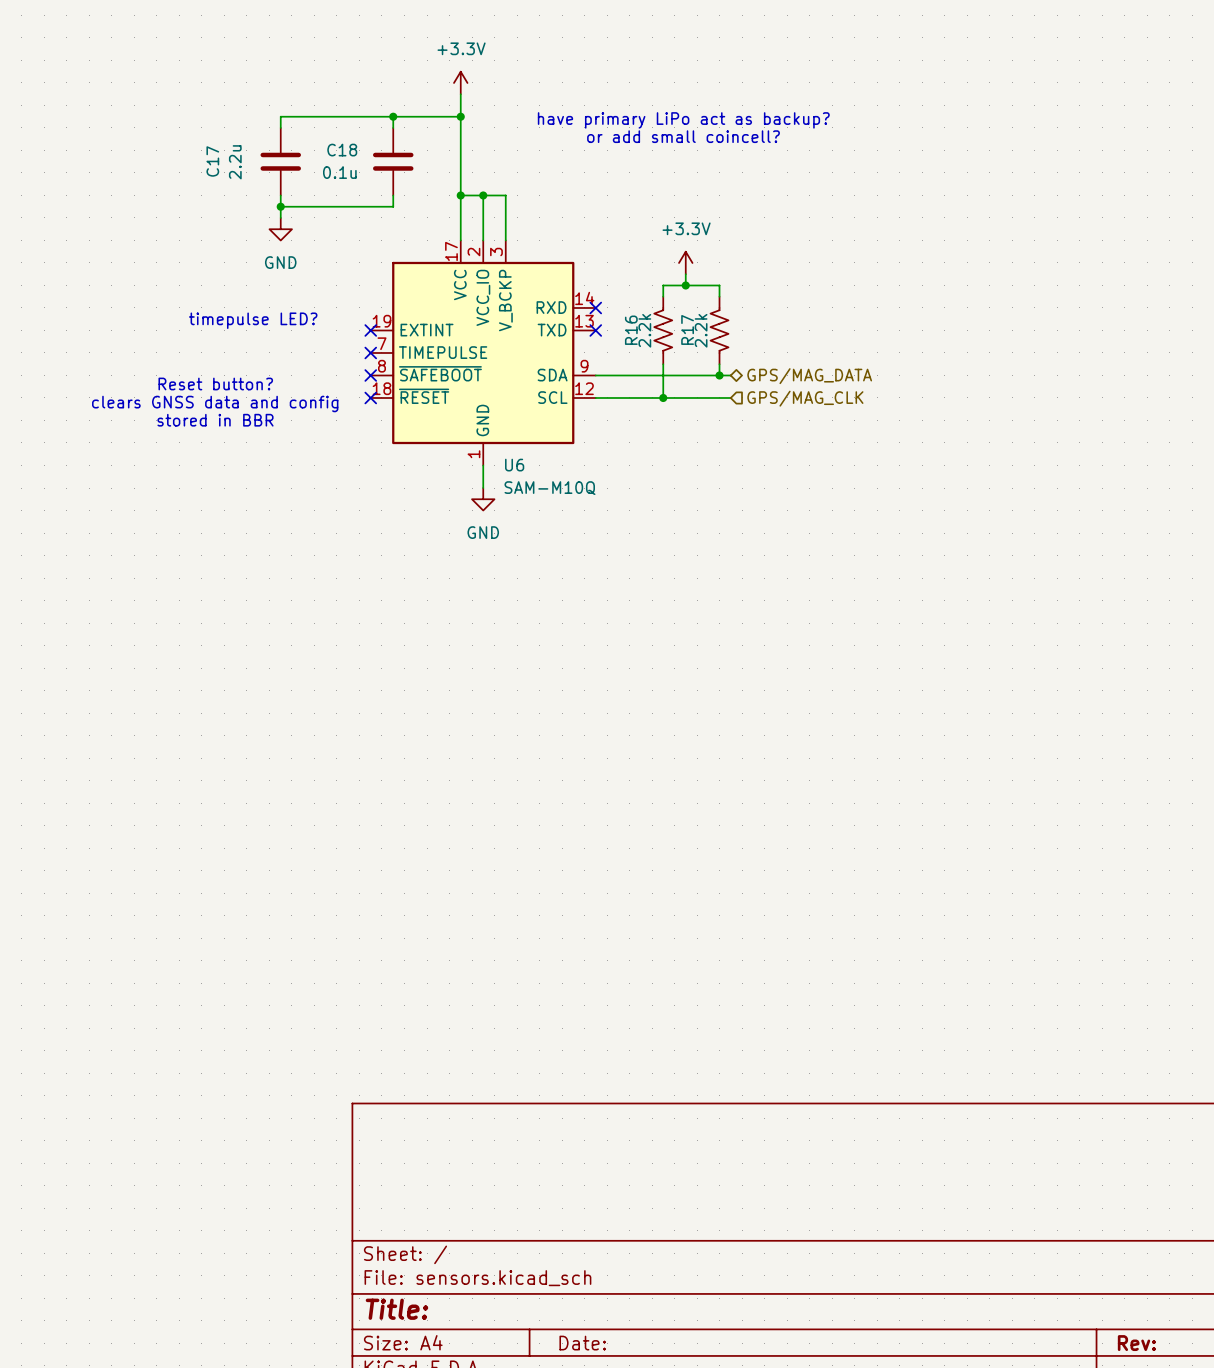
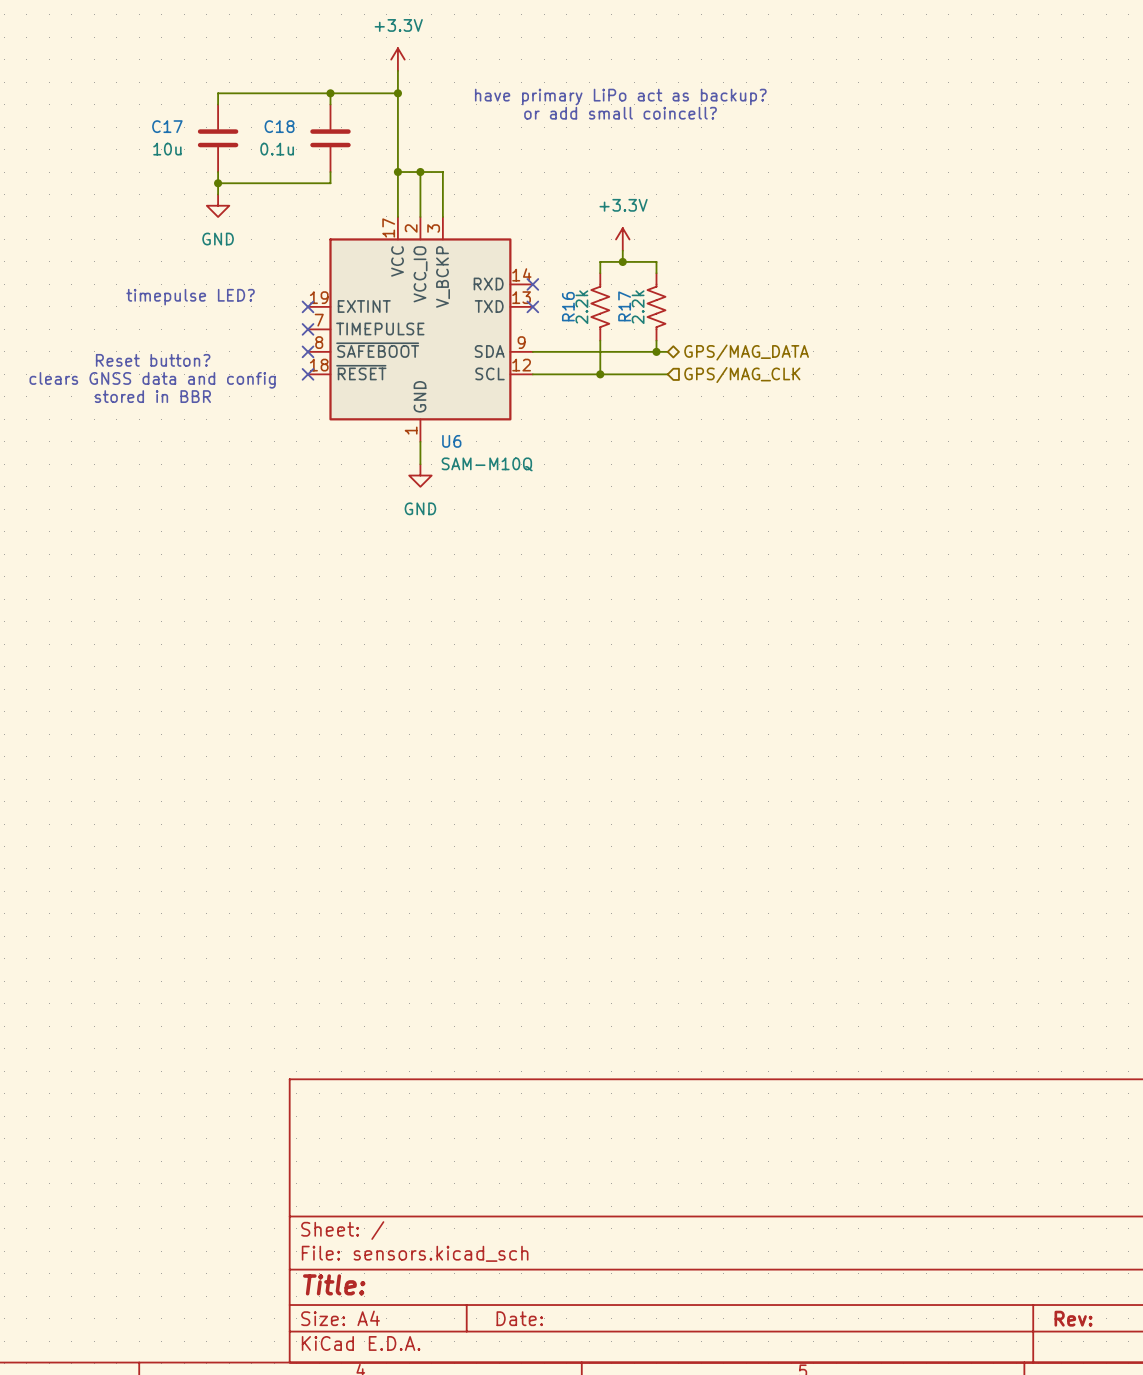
C17 name rotation: 0° (212, 161) -> 90° clockwise (167, 126)
C17 value: 2.2u (235, 162) -> 10u (167, 149)

